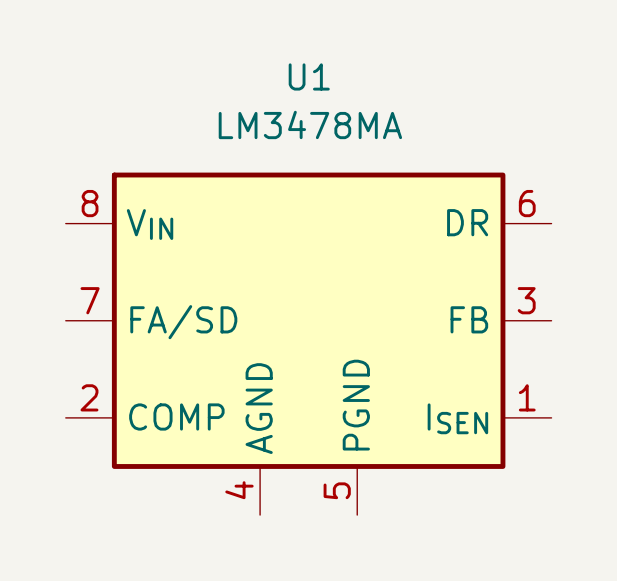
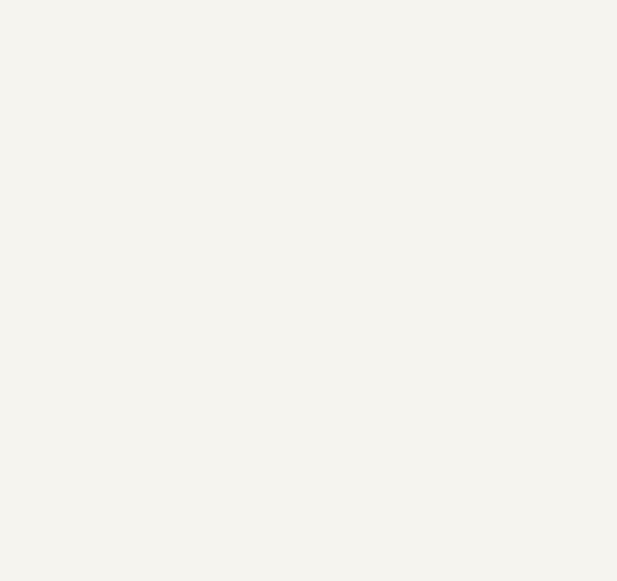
U1: LM3478MA (308, 343) -> none

